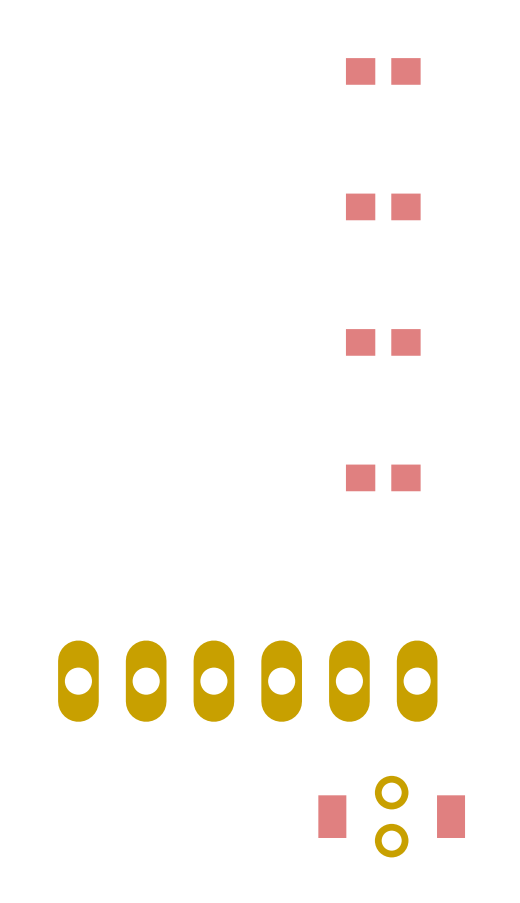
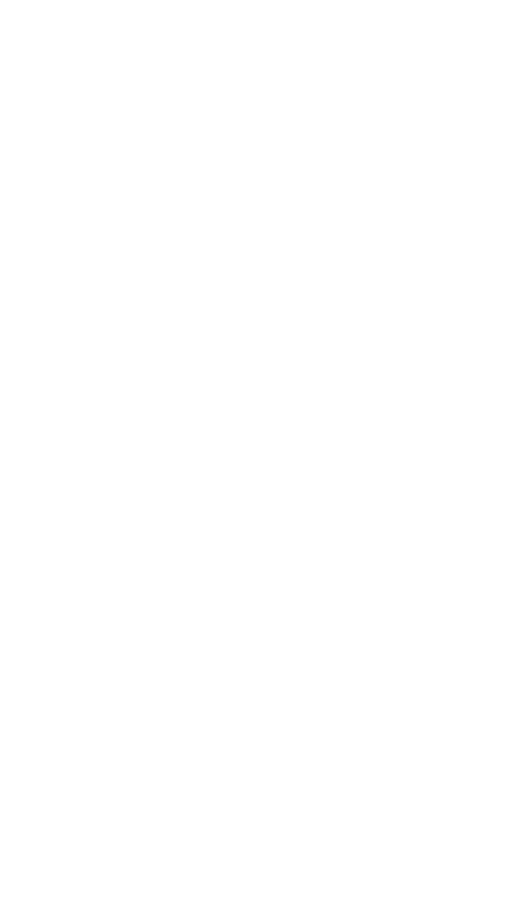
part: (383, 71) -> none
part: (383, 206) -> none
part: (383, 342) -> none
part: (383, 477) -> none
part: (247, 681) -> none
part: (391, 816) -> none

